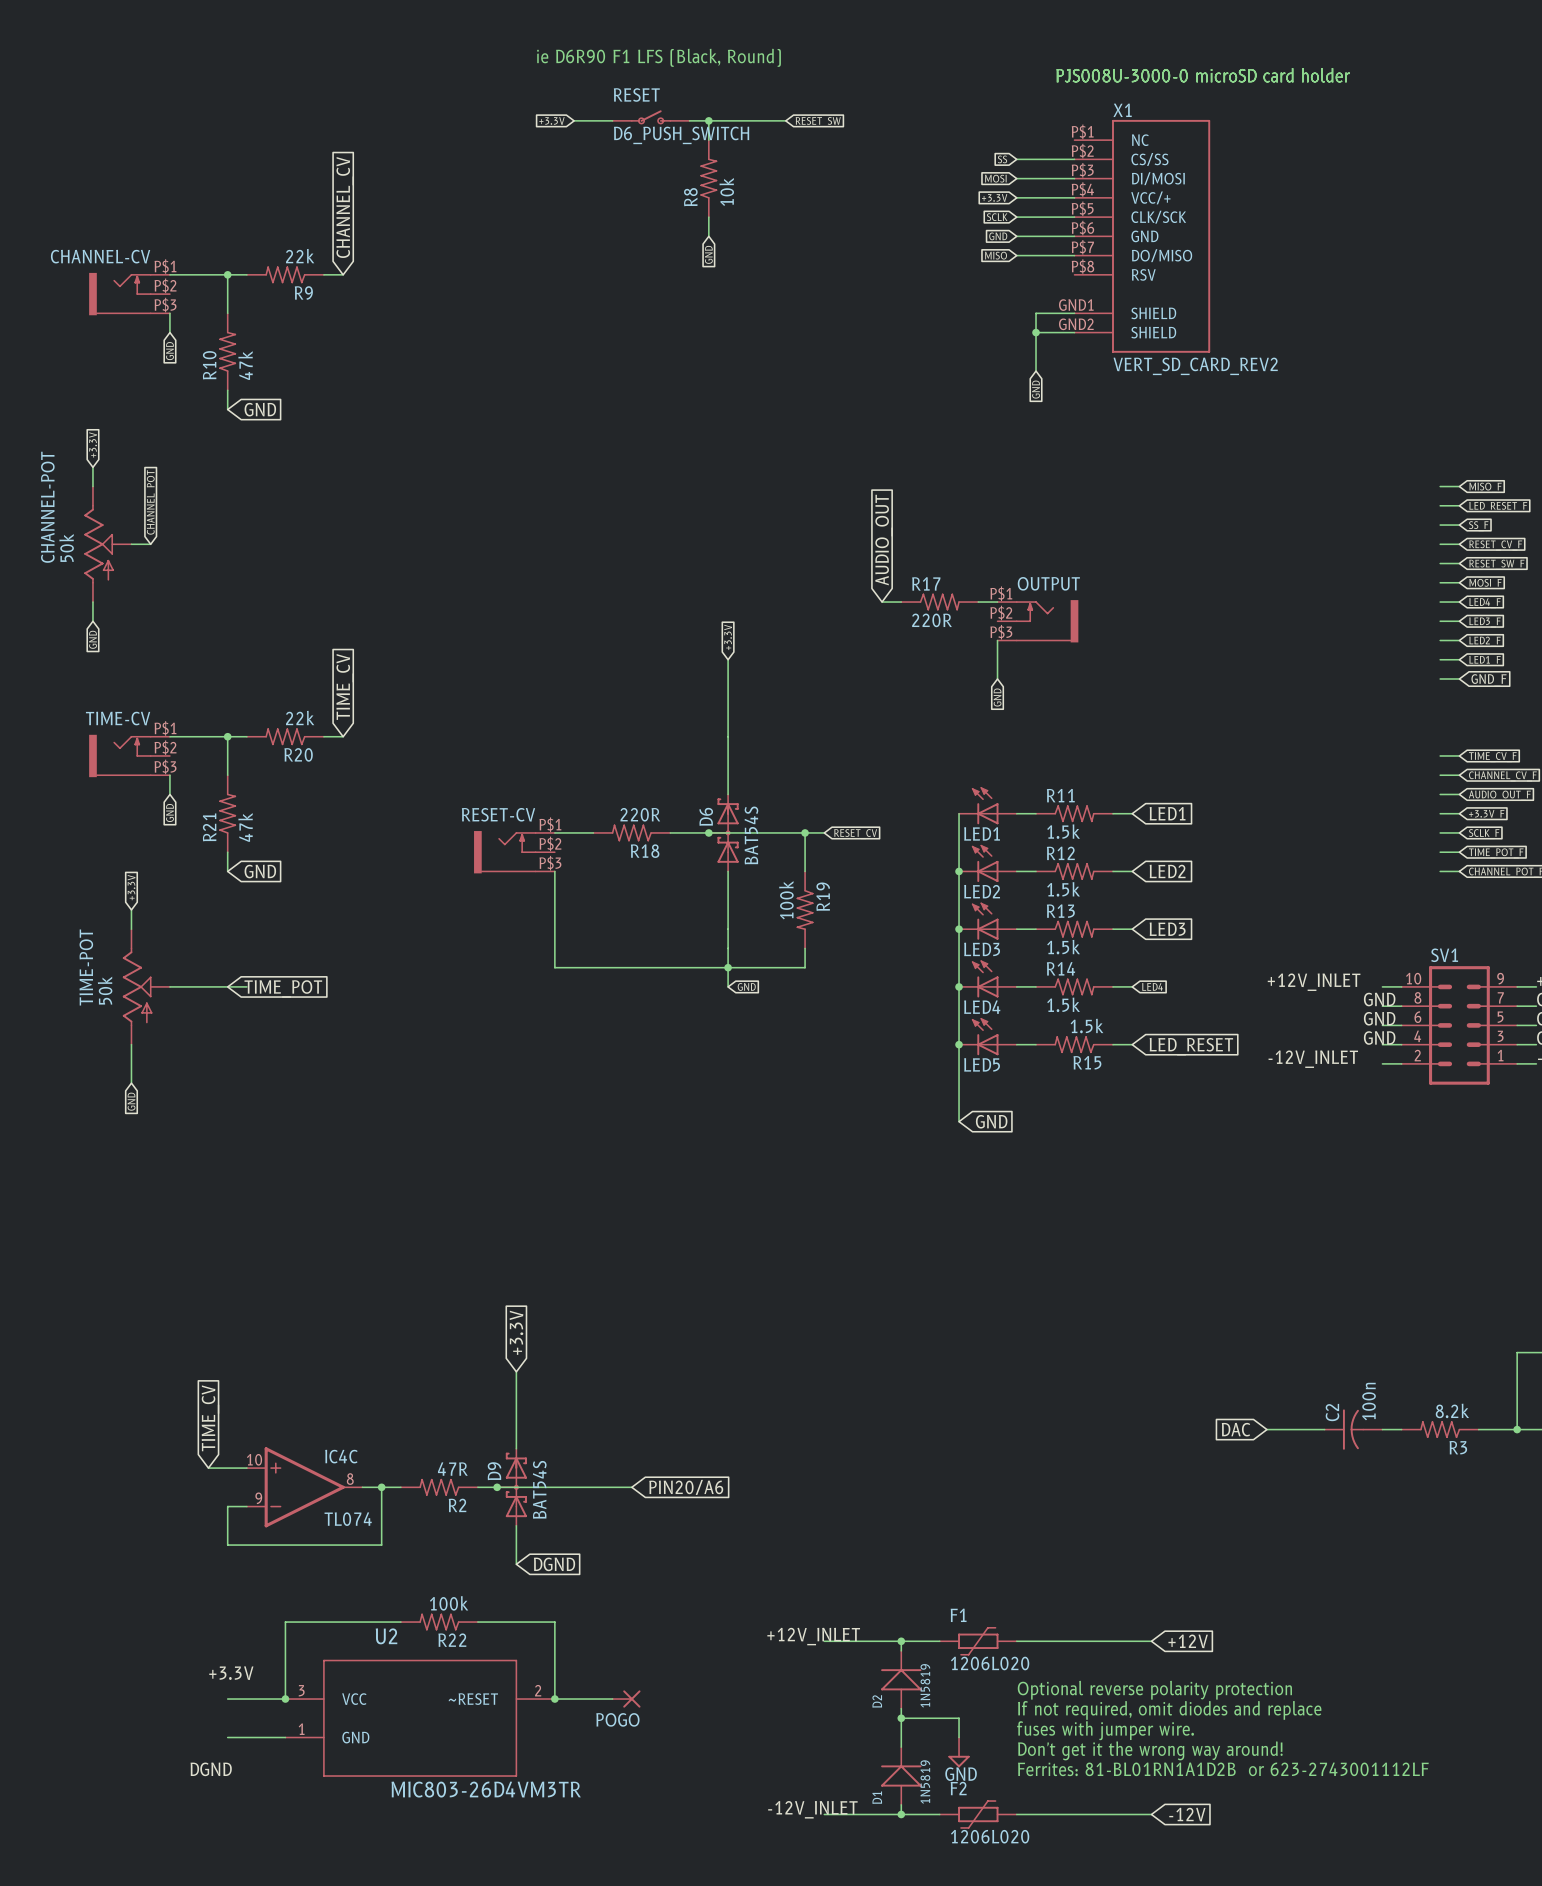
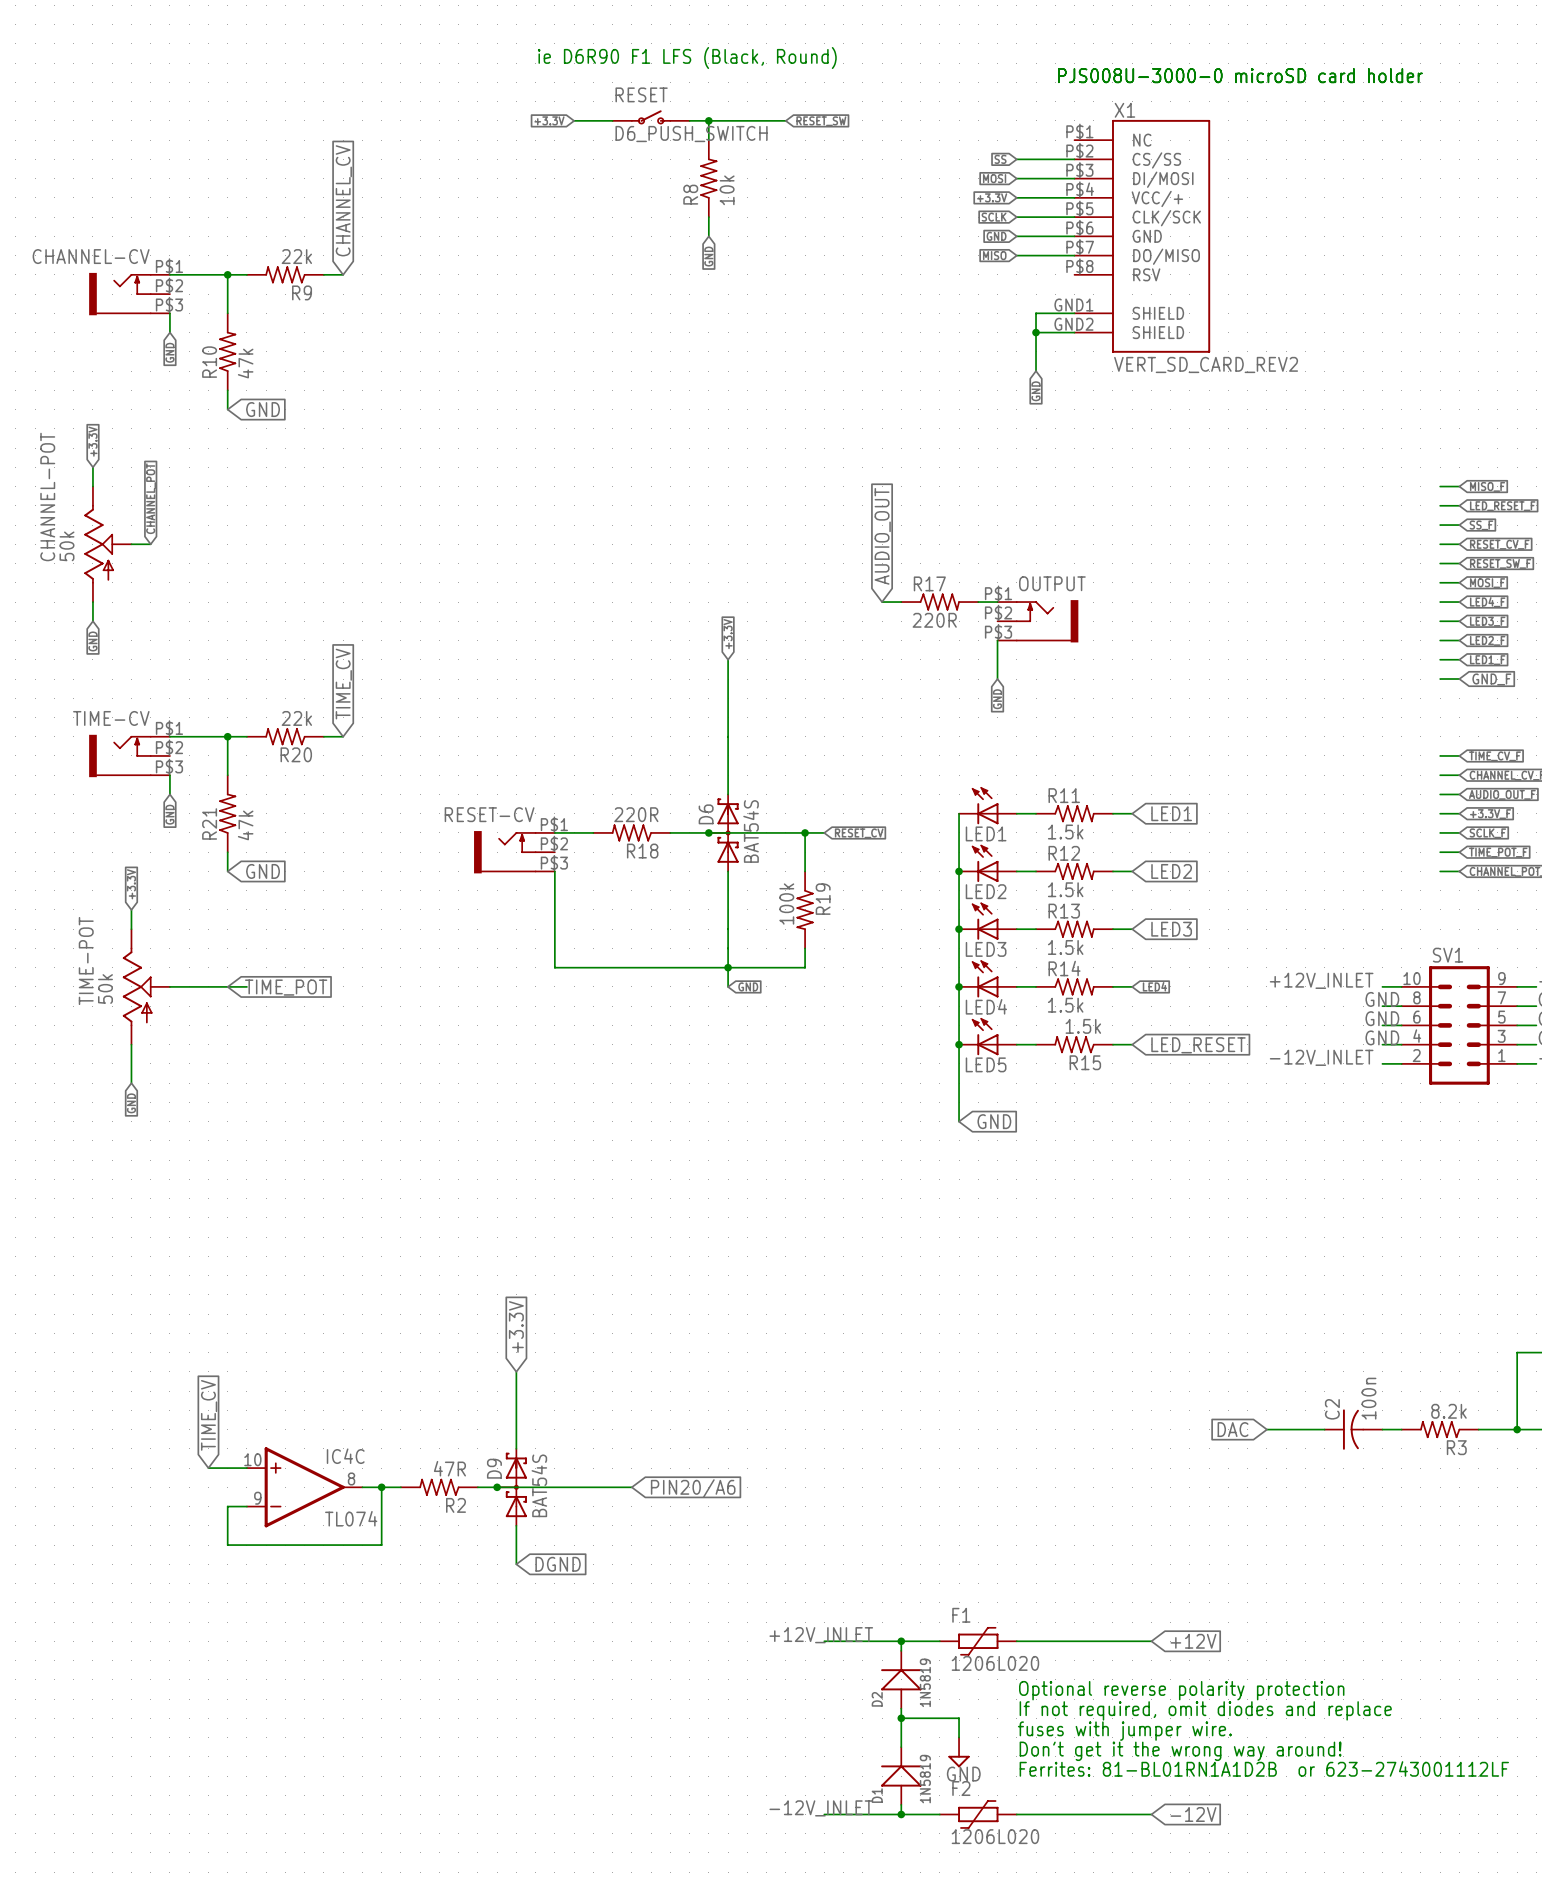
wire: (400, 1622) (285, 1622) (285, 1699) (227, 1699) -> none
R22: 100k (439, 1622) -> none
wire: (477, 1622) (554, 1622) (554, 1699) (612, 1699) -> none
label: +3.3V (231, 1673) -> none
junction: (285, 1699) -> none
junction: (554, 1699) -> none
POGO: (626, 1699) -> none
U2: MIC803-26D4VM3TR (420, 1718) -> none
wire: (227, 1737) (285, 1737) -> none
label: DGND (211, 1769) -> none

